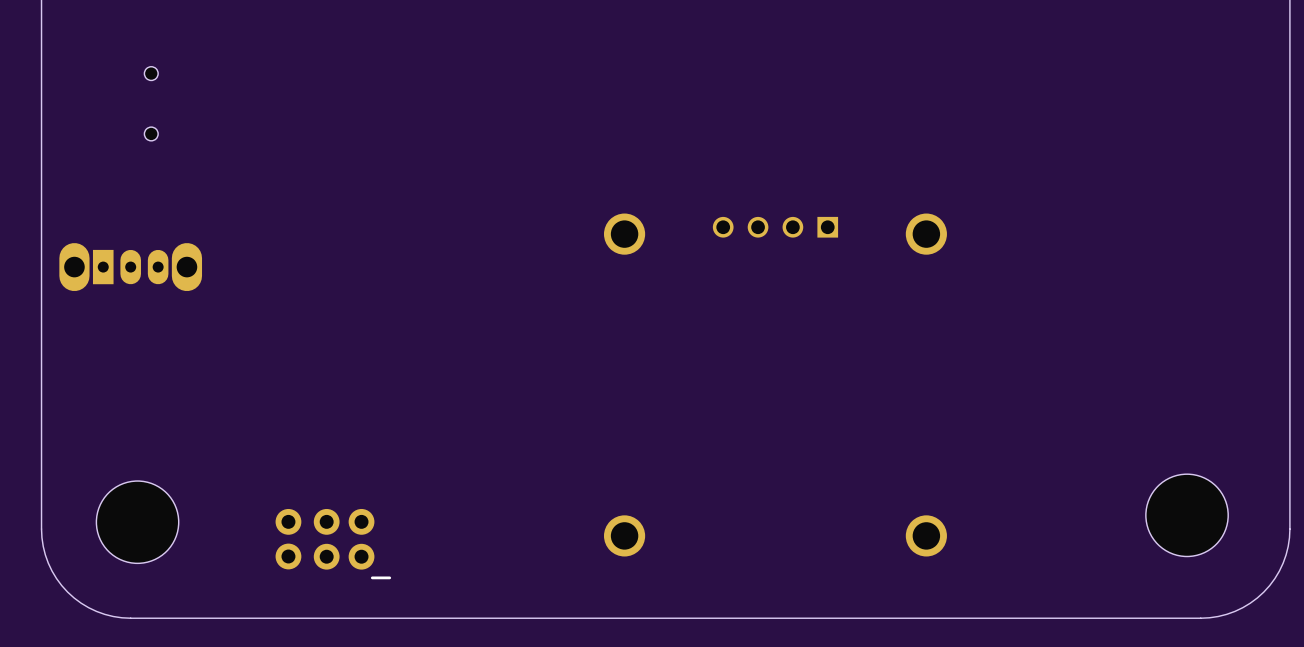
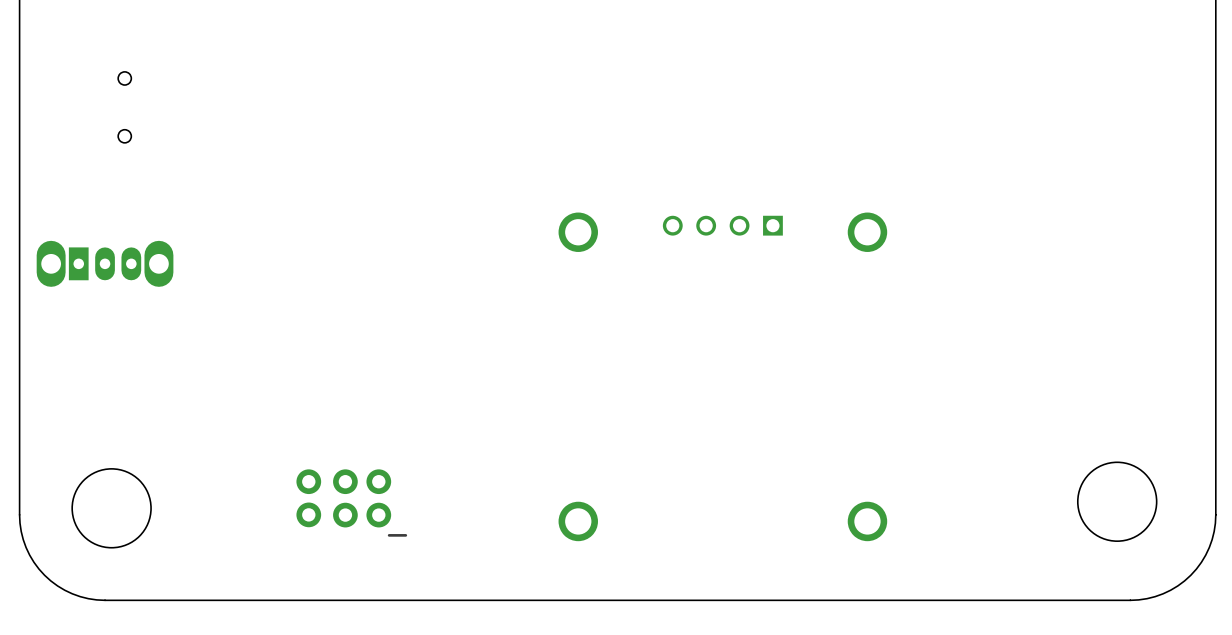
part position: (333, 544) -> (351, 503)

